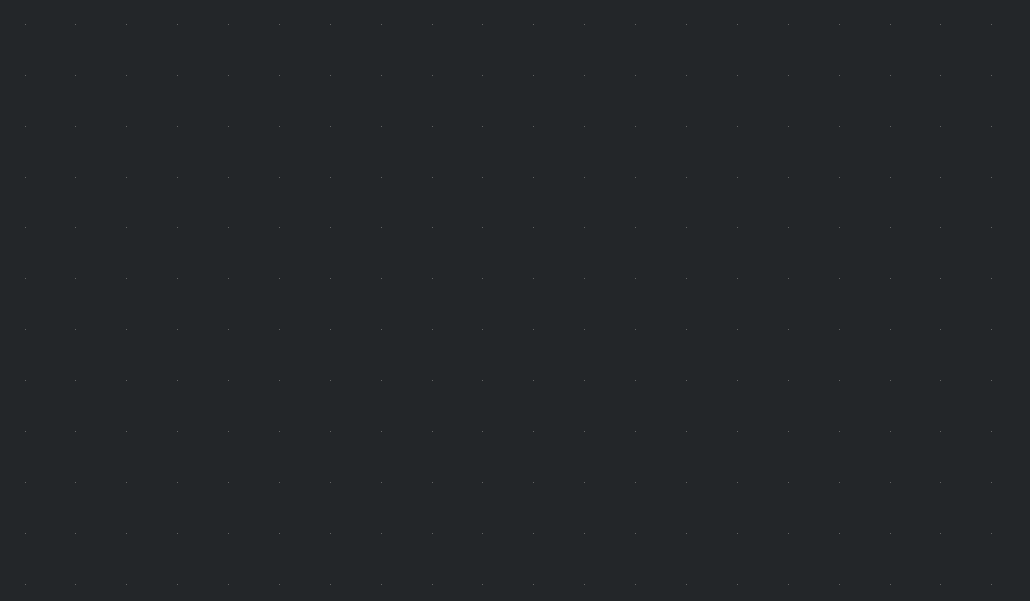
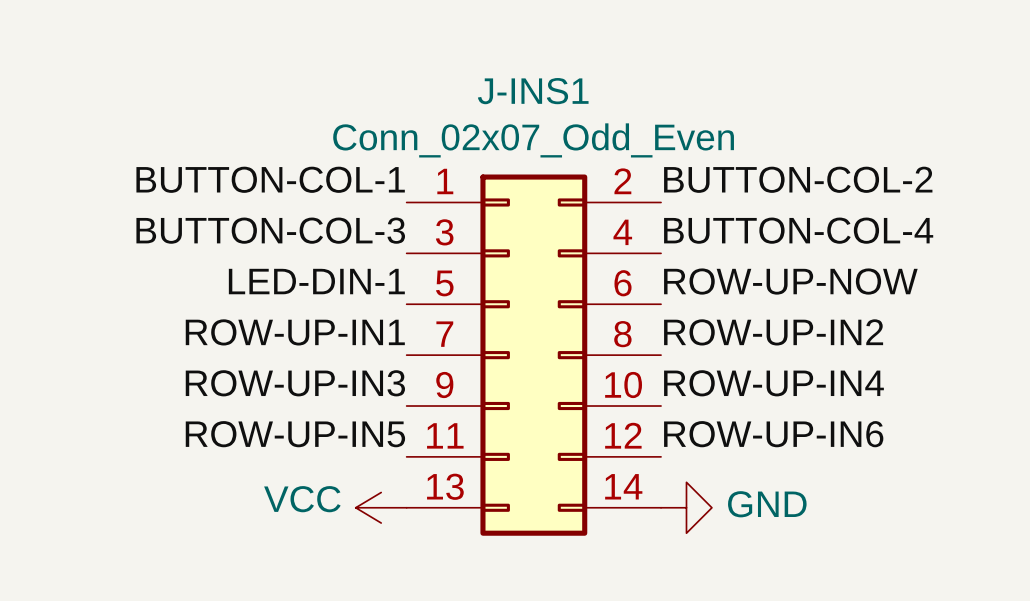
label: none -> BUTTON-COL-1 (270, 179)
label: none -> BUTTON-COL-2 (798, 179)
label: none -> BUTTON-COL-3 (270, 230)
label: none -> BUTTON-COL-4 (798, 230)
label: none -> LED-DIN-1 (316, 281)
label: none -> ROW-UP-NOW (790, 281)
label: none -> ROW-UP-IN1 (295, 332)
label: none -> ROW-UP-IN2 (773, 332)
J-INS1: none -> Conn_02x07_Odd_Even (533, 355)
label: none -> ROW-UP-IN4 (773, 383)
label: none -> ROW-UP-IN3 (295, 383)
label: none -> ROW-UP-IN5 (295, 434)
label: none -> ROW-UP-IN6 (773, 434)
power symbol: none -> VCC (381, 507)
power symbol: none -> GND (686, 507)

